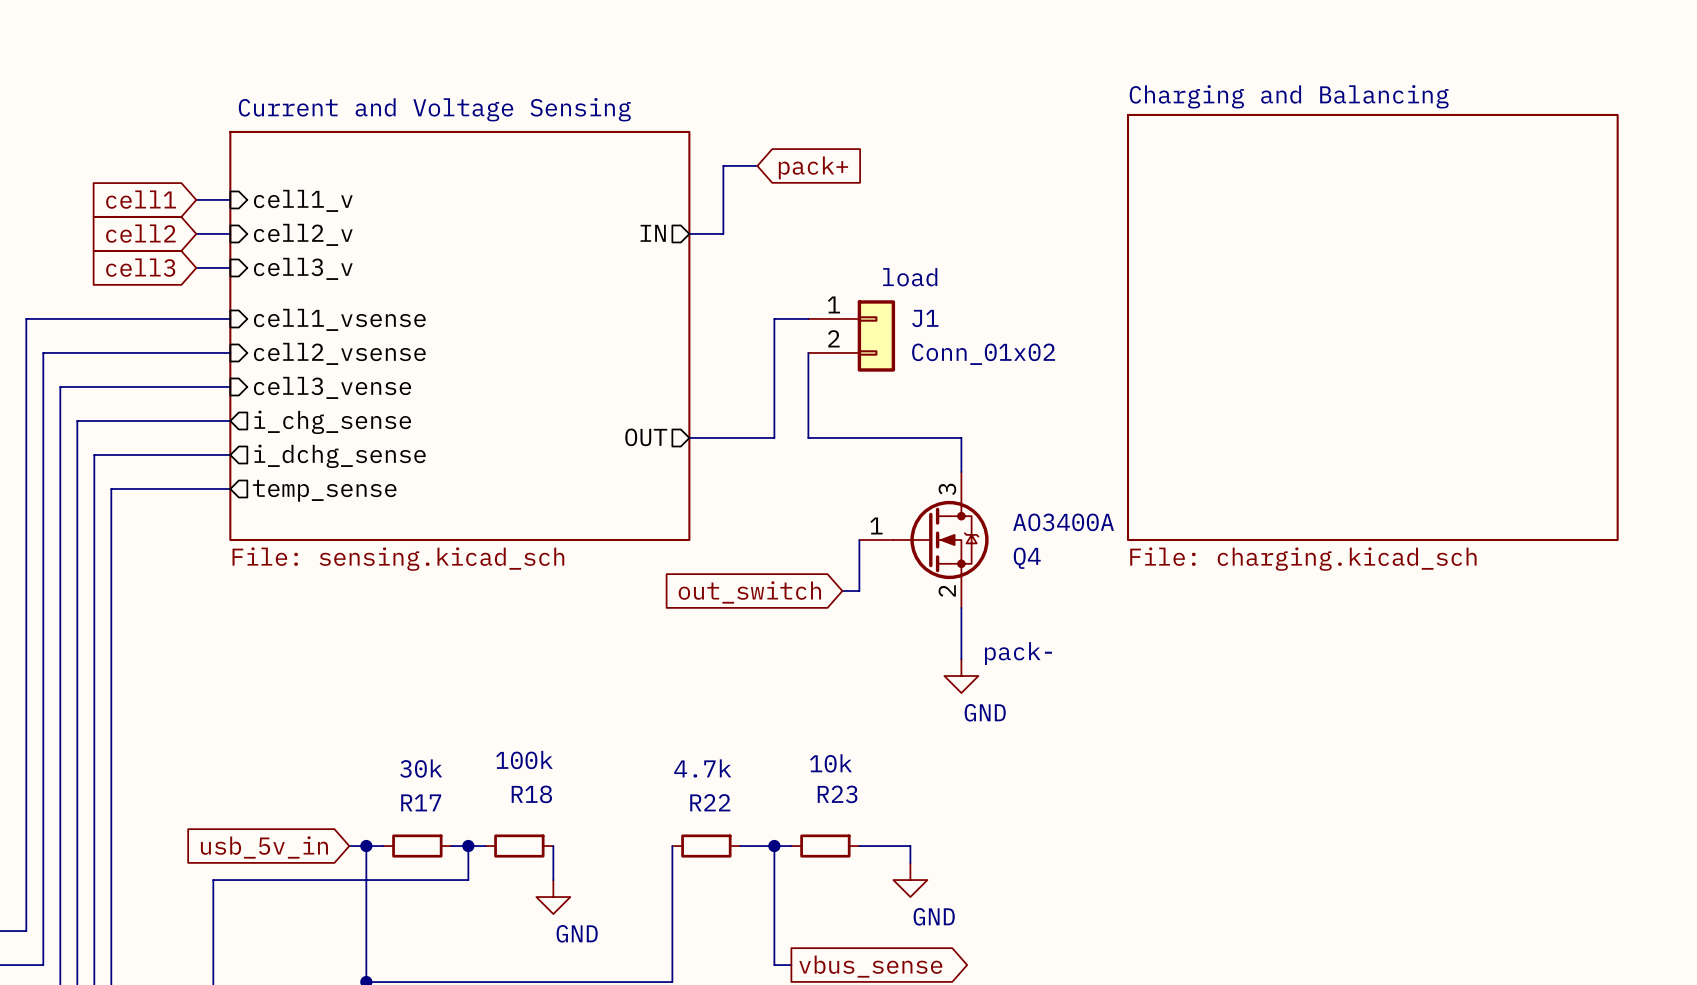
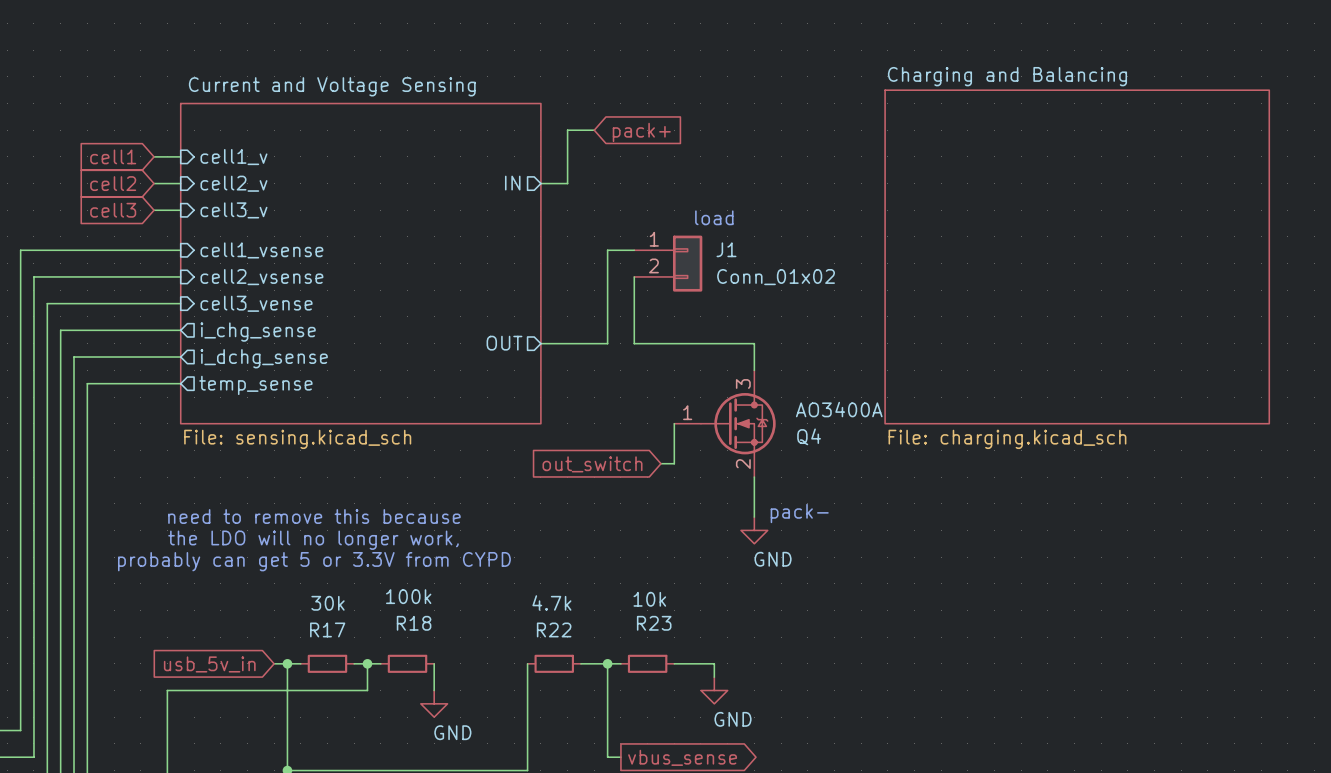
text: none -> need to remove this because (314, 516)
text: none -> the LDO will no longer work, (313, 540)
text: none -> probably can get 5 or 3.3V from CYPD (314, 561)

